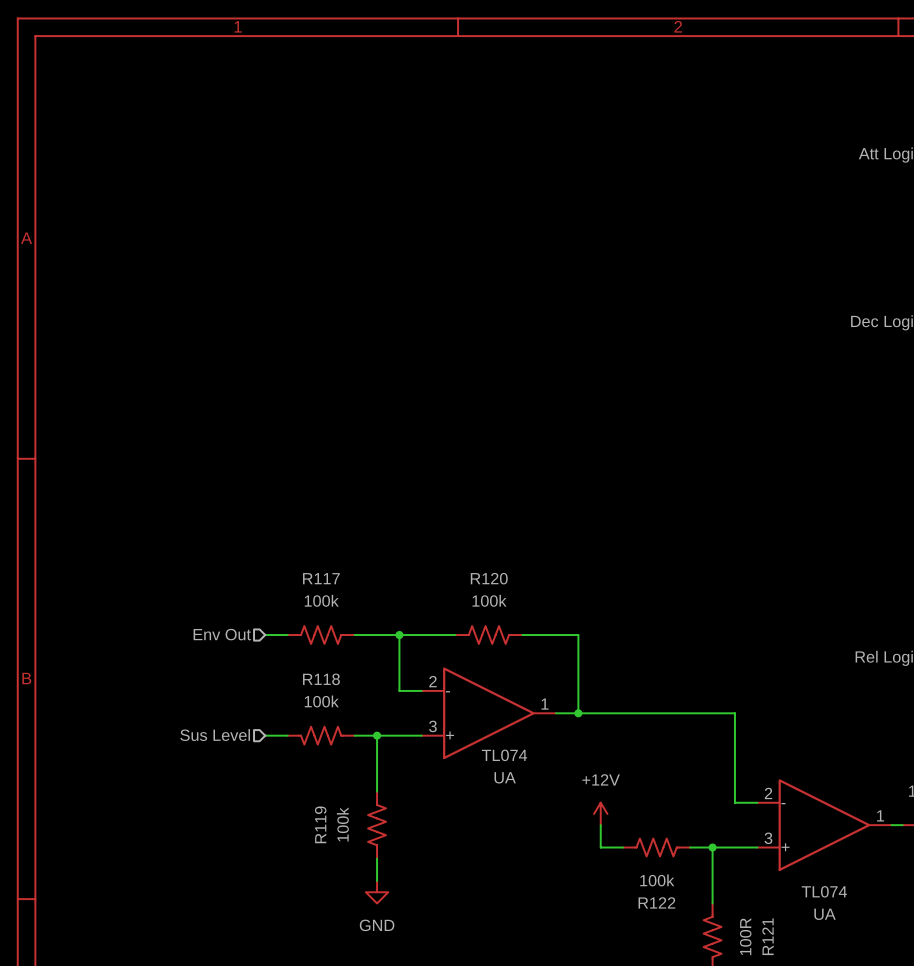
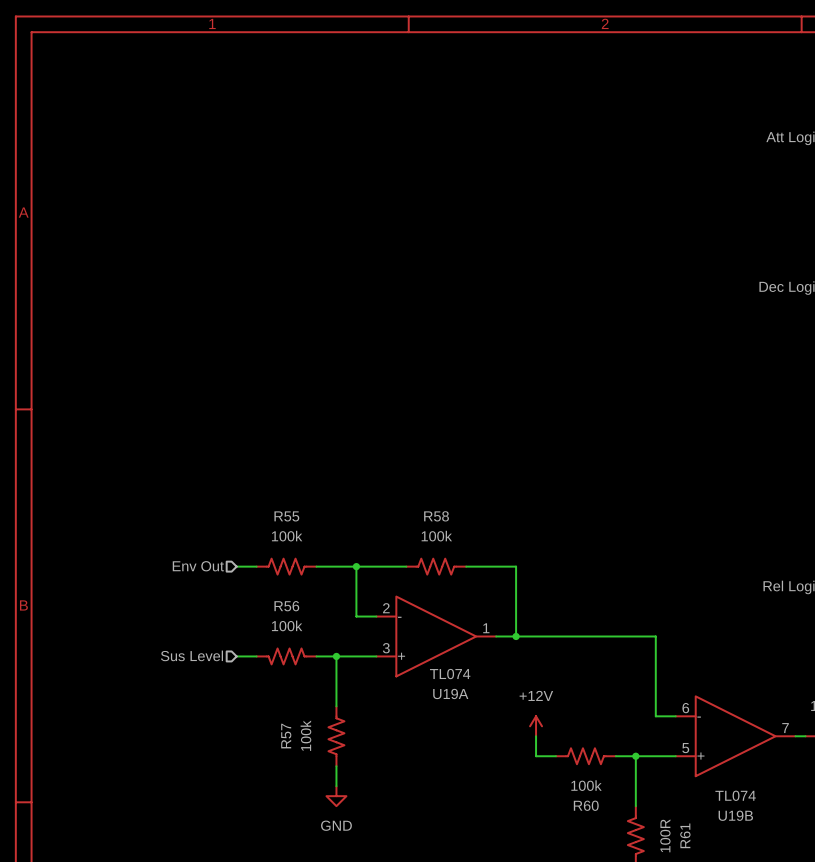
R117 name: R117 (321, 578) -> R55 (286, 516)
R120 name: R120 (489, 578) -> R58 (436, 516)
R118 name: R118 (321, 679) -> R56 (286, 606)
UA name: UA (505, 777) -> U19A (450, 693)
UA pin number: 2 (768, 793) -> 6 (685, 708)
UA pin number: 1 (880, 815) -> 7 (785, 728)
R119 name: R119 (320, 824) -> R57 (286, 736)
UA pin number: 3 (768, 838) -> 5 (685, 748)
R122 name: R122 (656, 902) -> R60 (586, 805)
UA name: UA (825, 914) -> U19B (735, 815)
R121 name: R121 (768, 936) -> R61 (685, 835)

